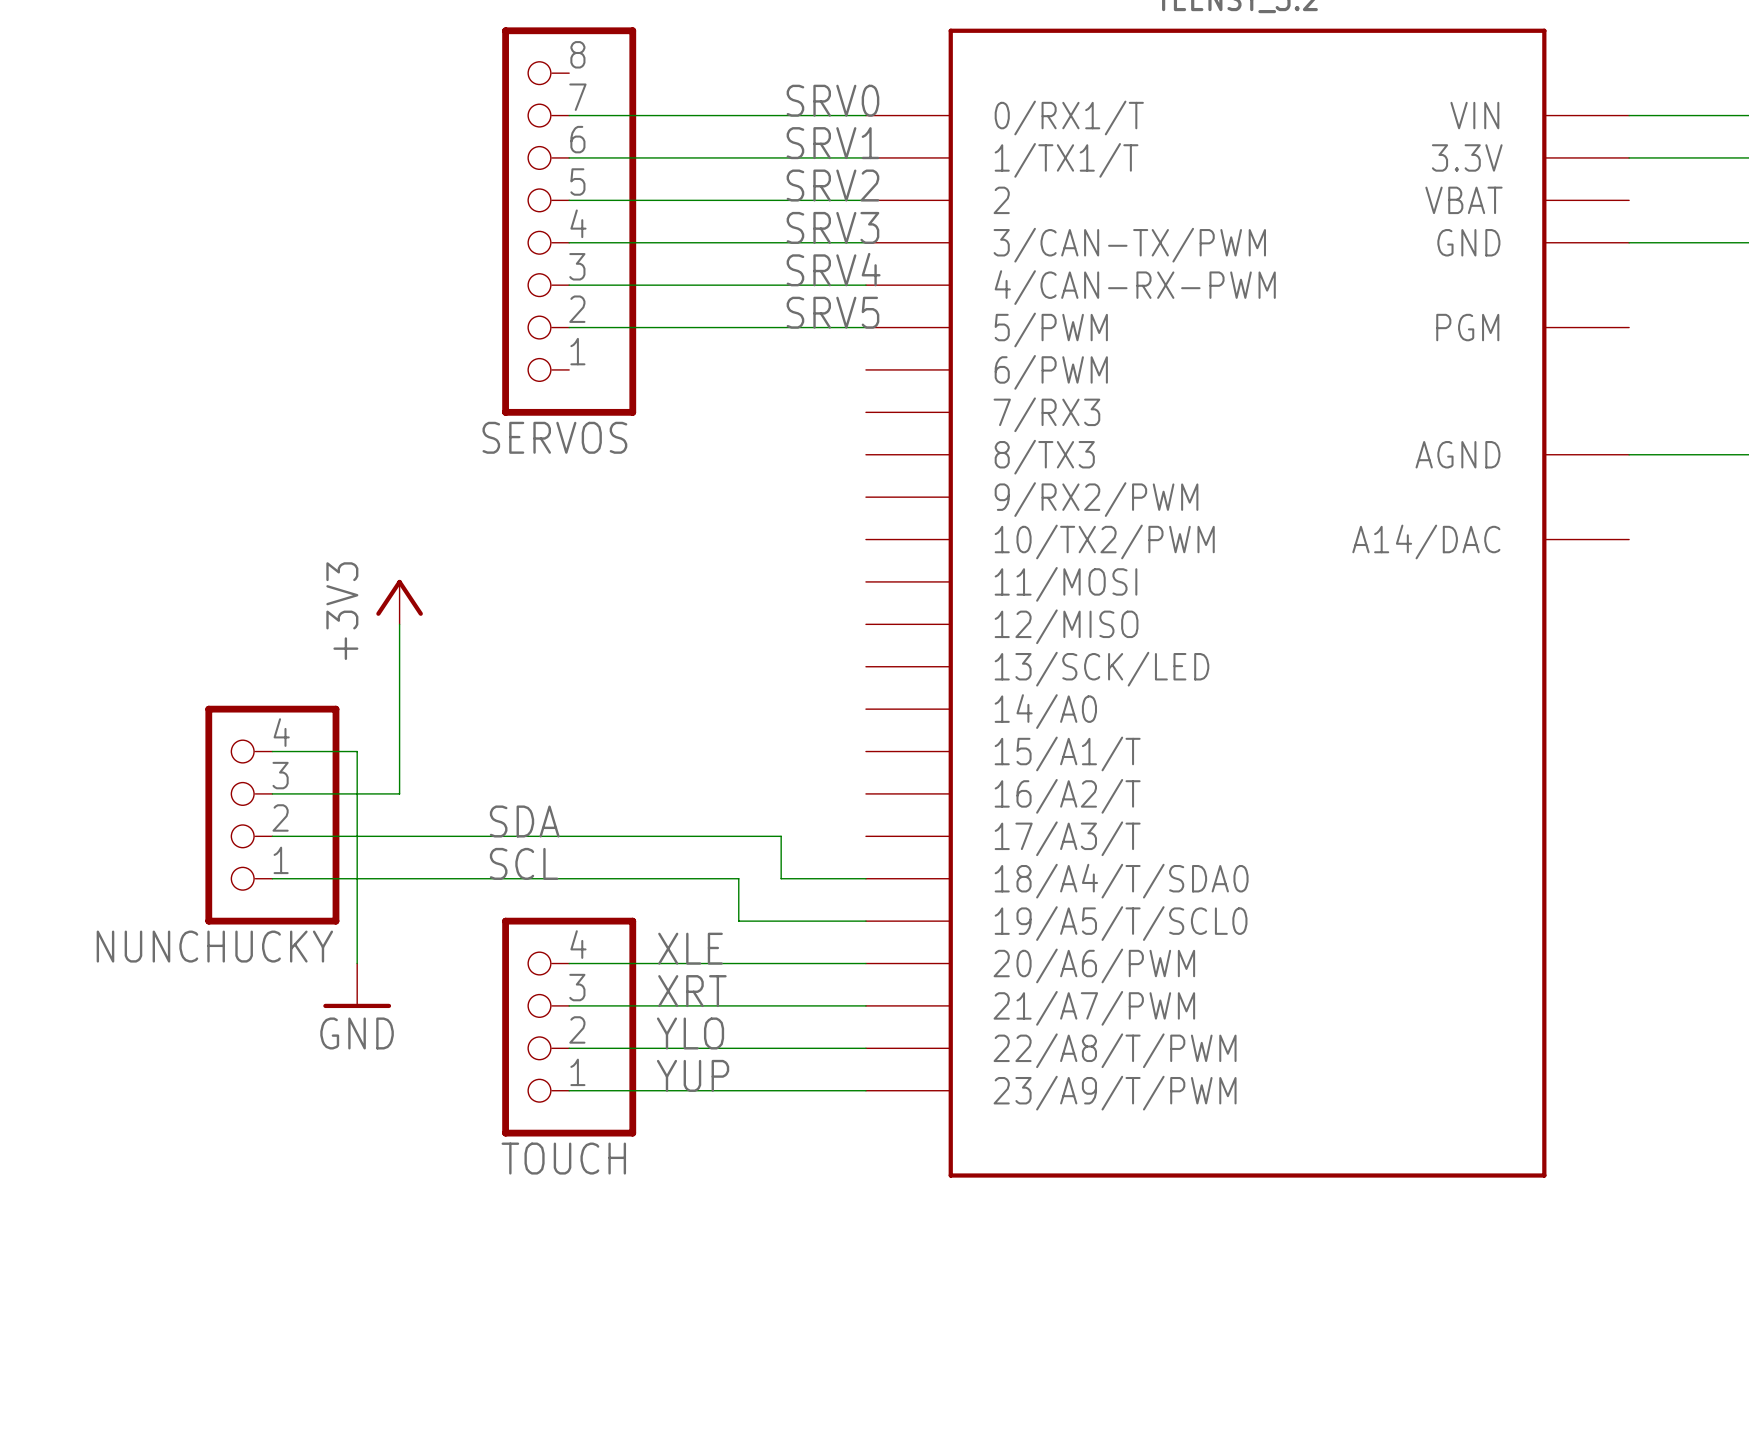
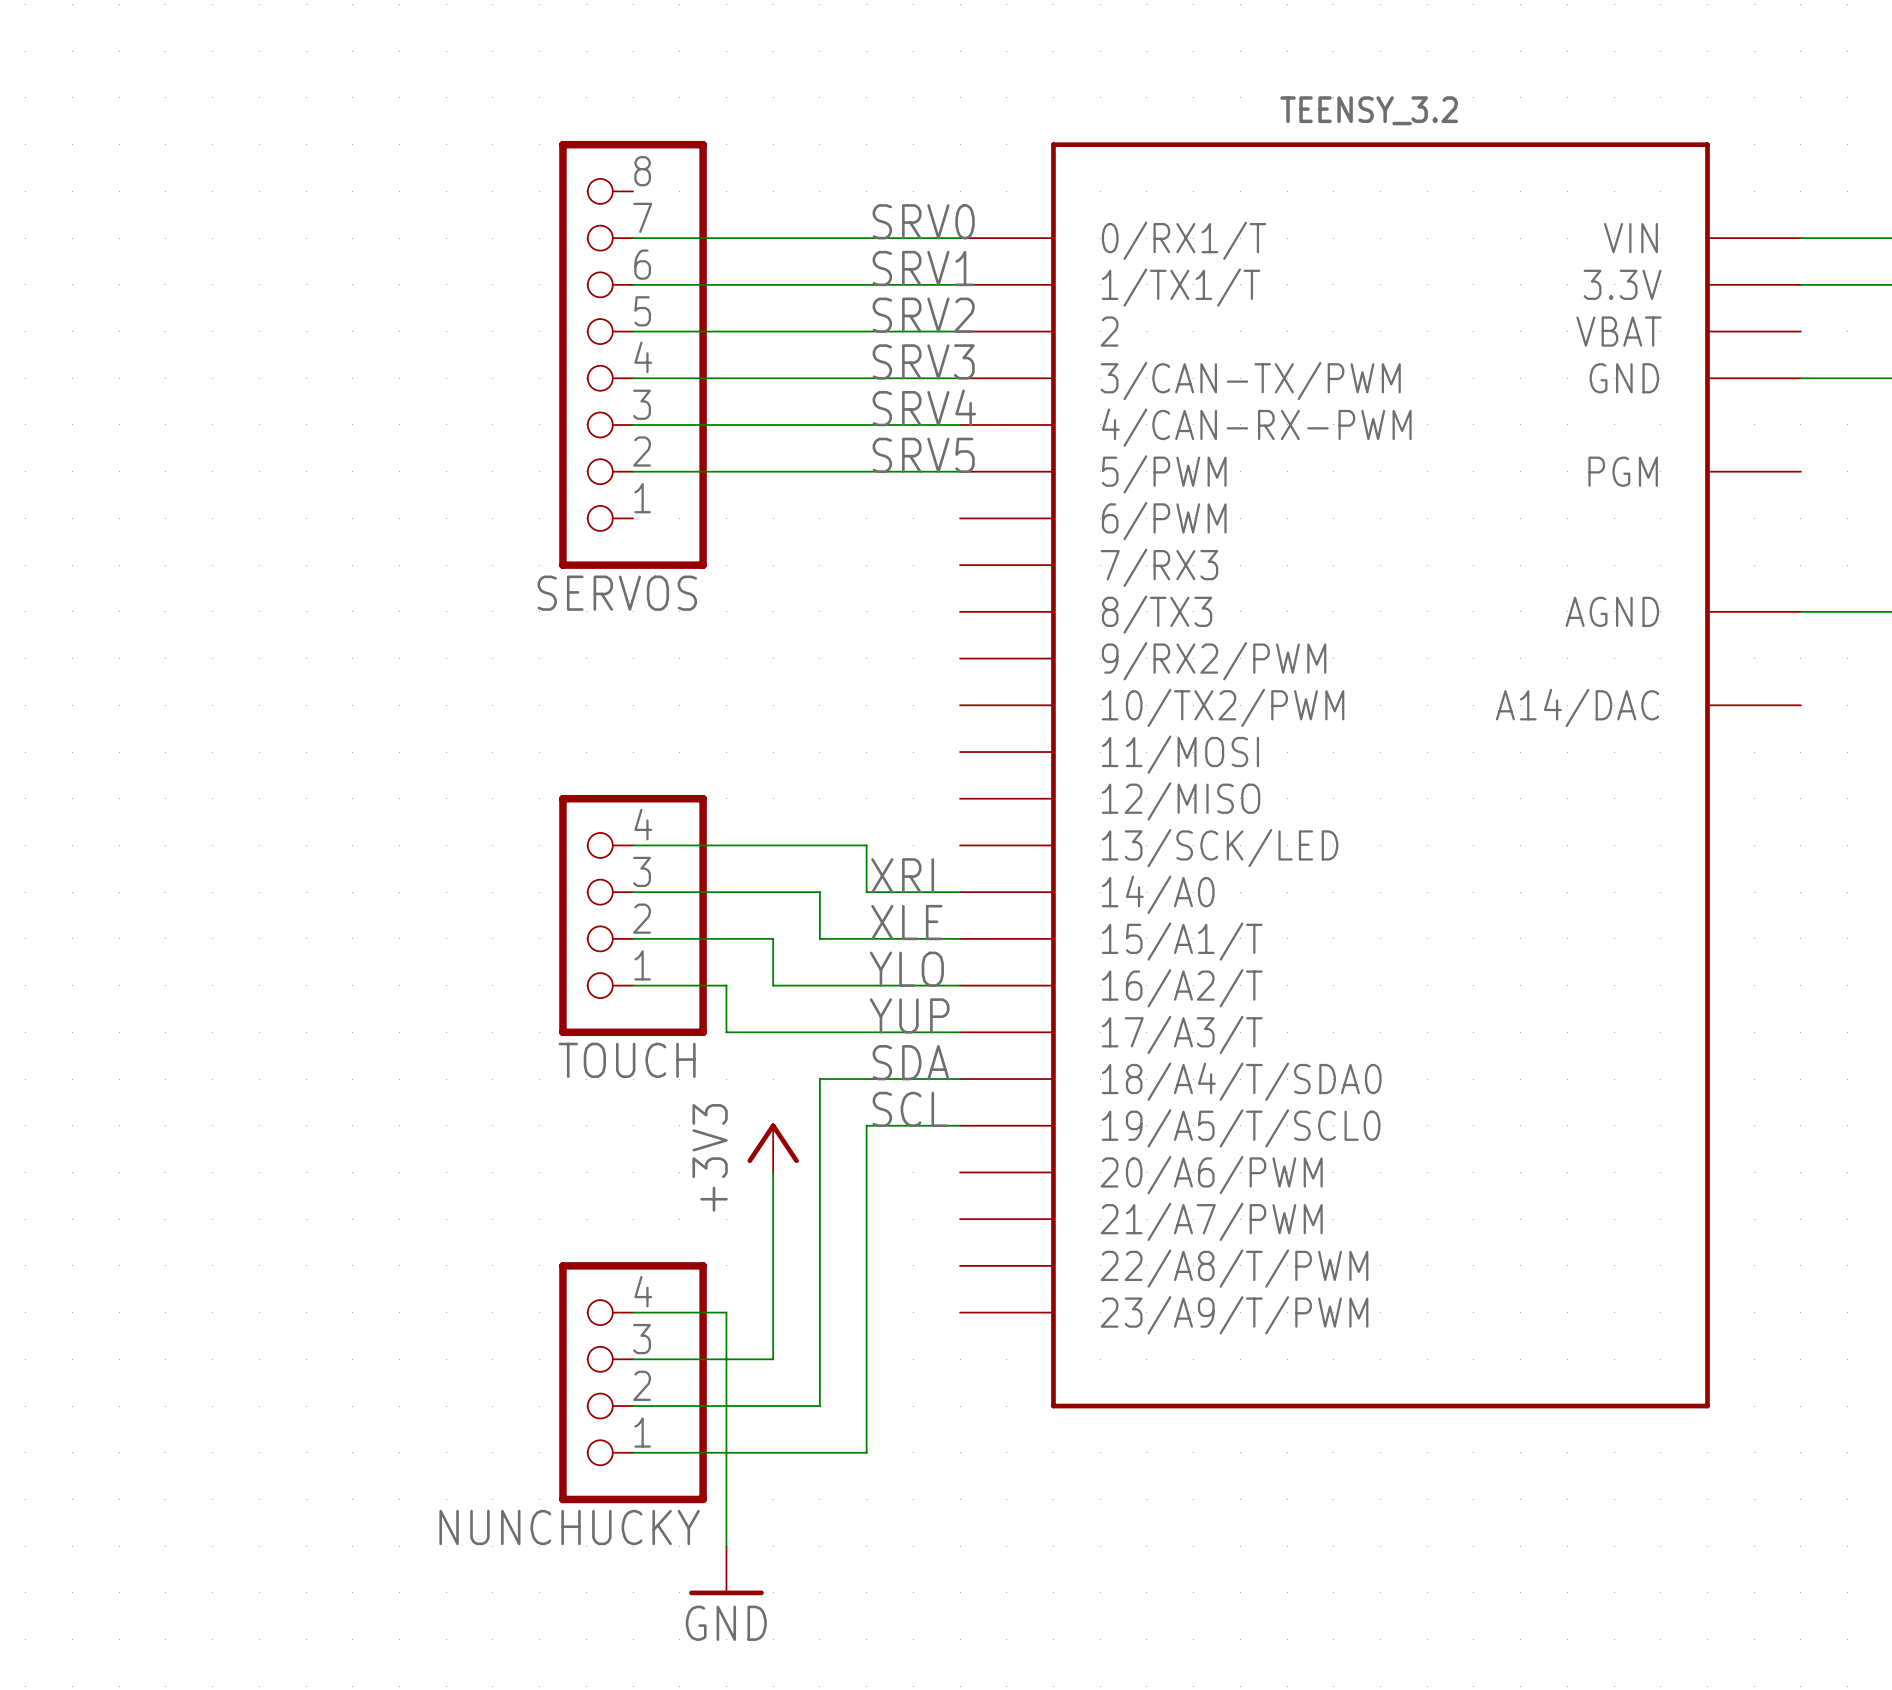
power symbol: +3V3 (399, 602) -> none
wire: (399, 624) (399, 793) (272, 793) -> none
wire: none -> (633, 845) (866, 845) (866, 892) (960, 892)
label: none -> XRI (902, 875)
wire: none -> (633, 892) (819, 892) (819, 938) (960, 938)
wire: (272, 751) (357, 751) (357, 963) -> none
wire: none -> (633, 938) (773, 938) (773, 985) (960, 985)
NUNCHUCKY: (272, 815) -> none
label position: SDA (524, 821) -> SDA (911, 1062)
wire: (272, 836) (653, 836) -> (633, 985) (726, 985) (726, 1032)
wire: (781, 836) (781, 878) -> (819, 1079) (866, 1079)
wire: none -> (866, 1032) (960, 1032)
label position: SCL (524, 863) -> SCL (910, 1109)
wire: (272, 878) (738, 878) -> none
wire: (738, 921) (781, 921) -> (819, 1125) (819, 1406) (633, 1406)
wire: none -> (866, 1125) (866, 1452) (633, 1452)
power symbol: none -> +3V3 (773, 1147)
label position: XLE (690, 948) -> XLE (906, 922)
wire: (569, 963) (865, 963) -> none
wire: none -> (773, 1172) (773, 1359) (633, 1359)
power symbol: GND (357, 985) -> none
label: XRT (692, 991) -> none
wire: (569, 1005) (865, 1005) -> none
TOUCH position: (569, 1027) -> (633, 915)
label position: YLO (690, 1033) -> YLO (906, 969)
wire: (569, 1048) (865, 1048) -> none
label position: YUP (693, 1075) -> YUP (909, 1015)
wire: (653, 1090) (865, 1090) -> (726, 1312) (726, 1546)
NUNCHUCKY: none -> (633, 1382)
power symbol: none -> GND (726, 1570)

